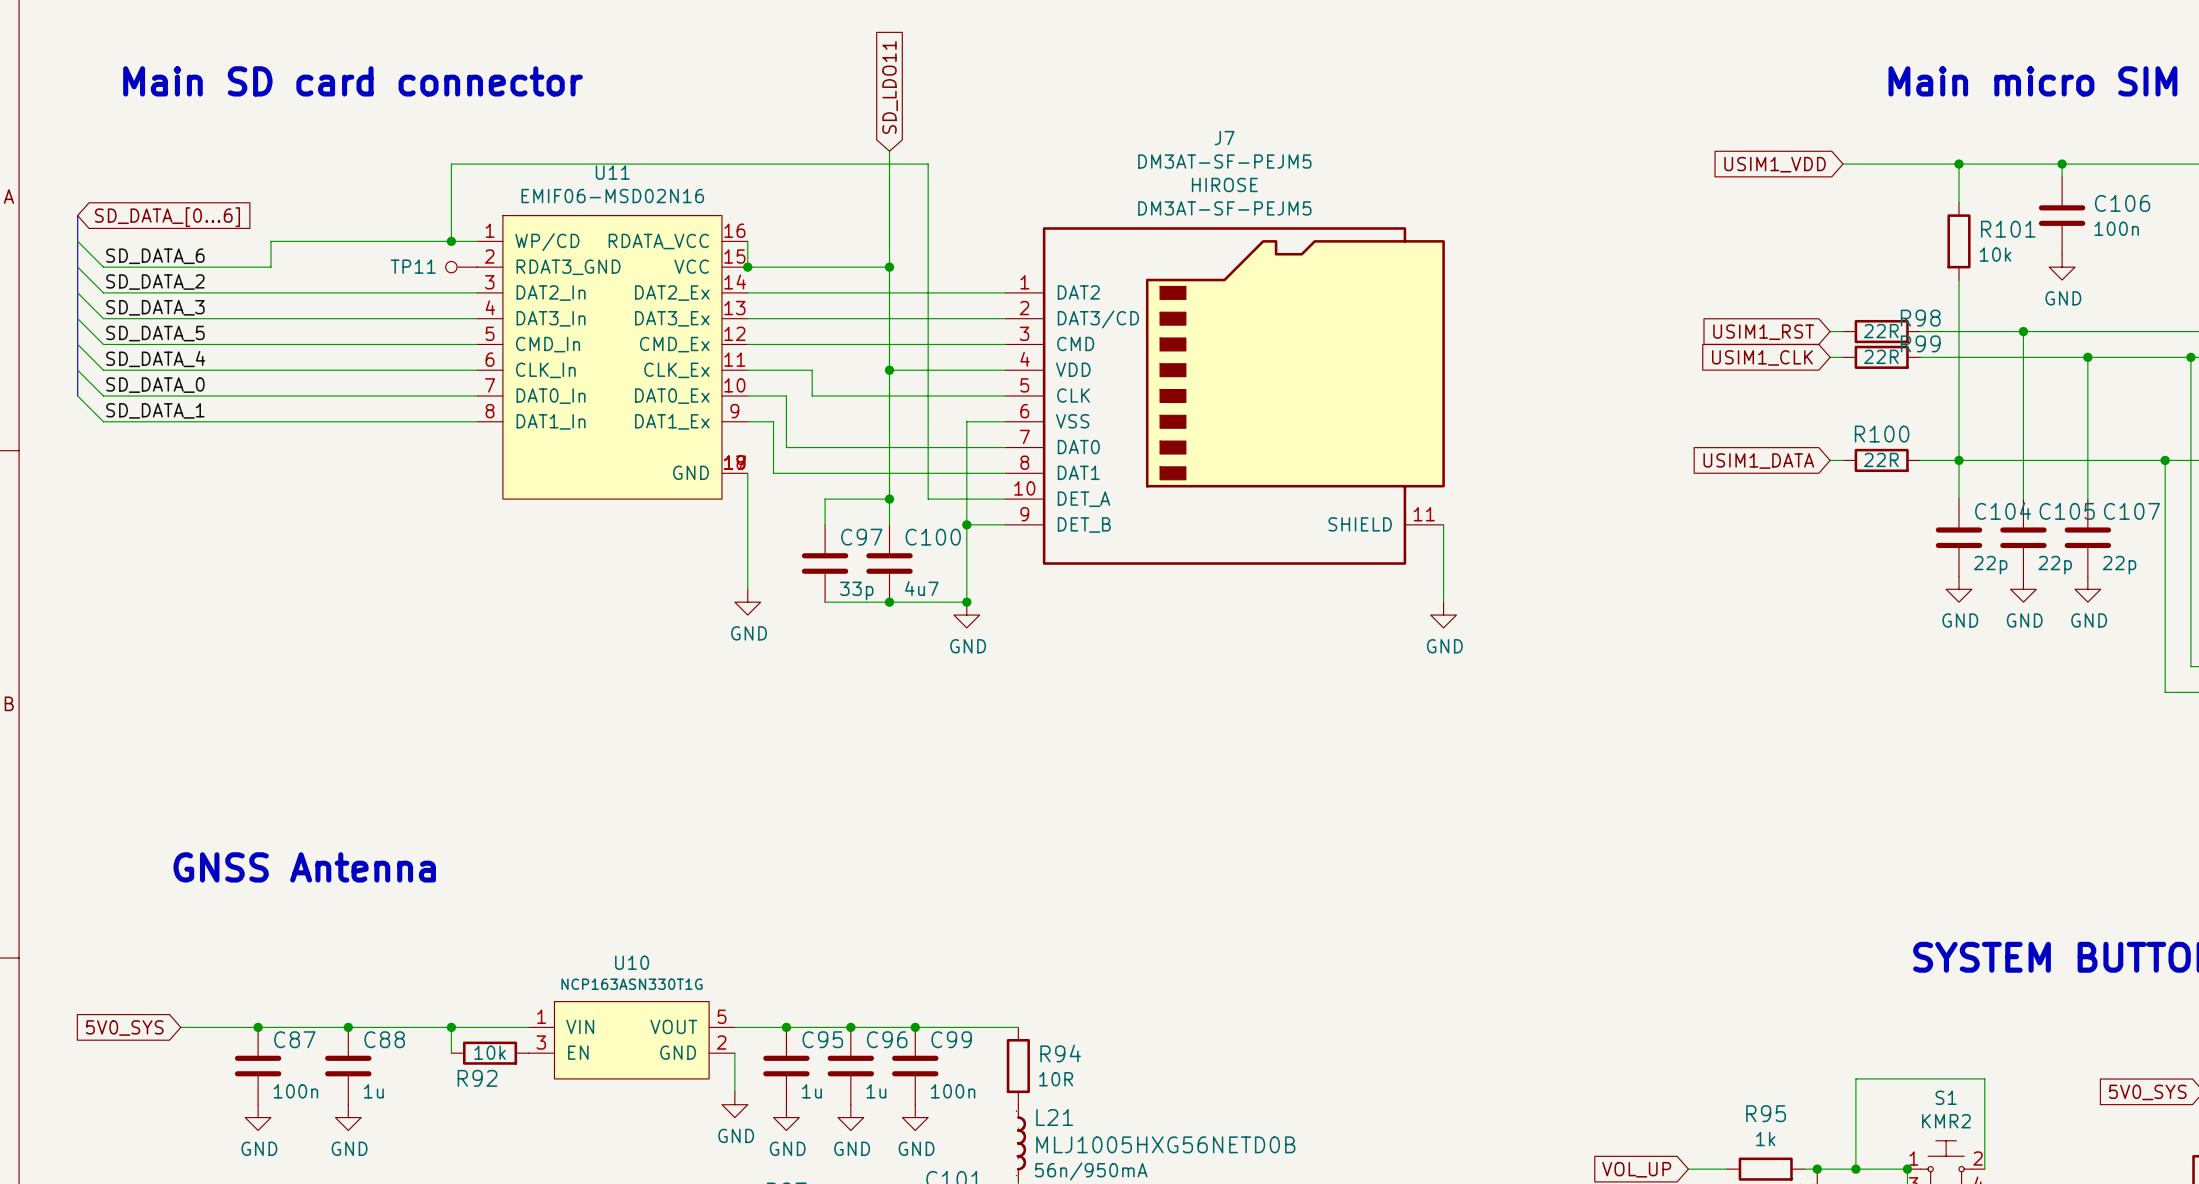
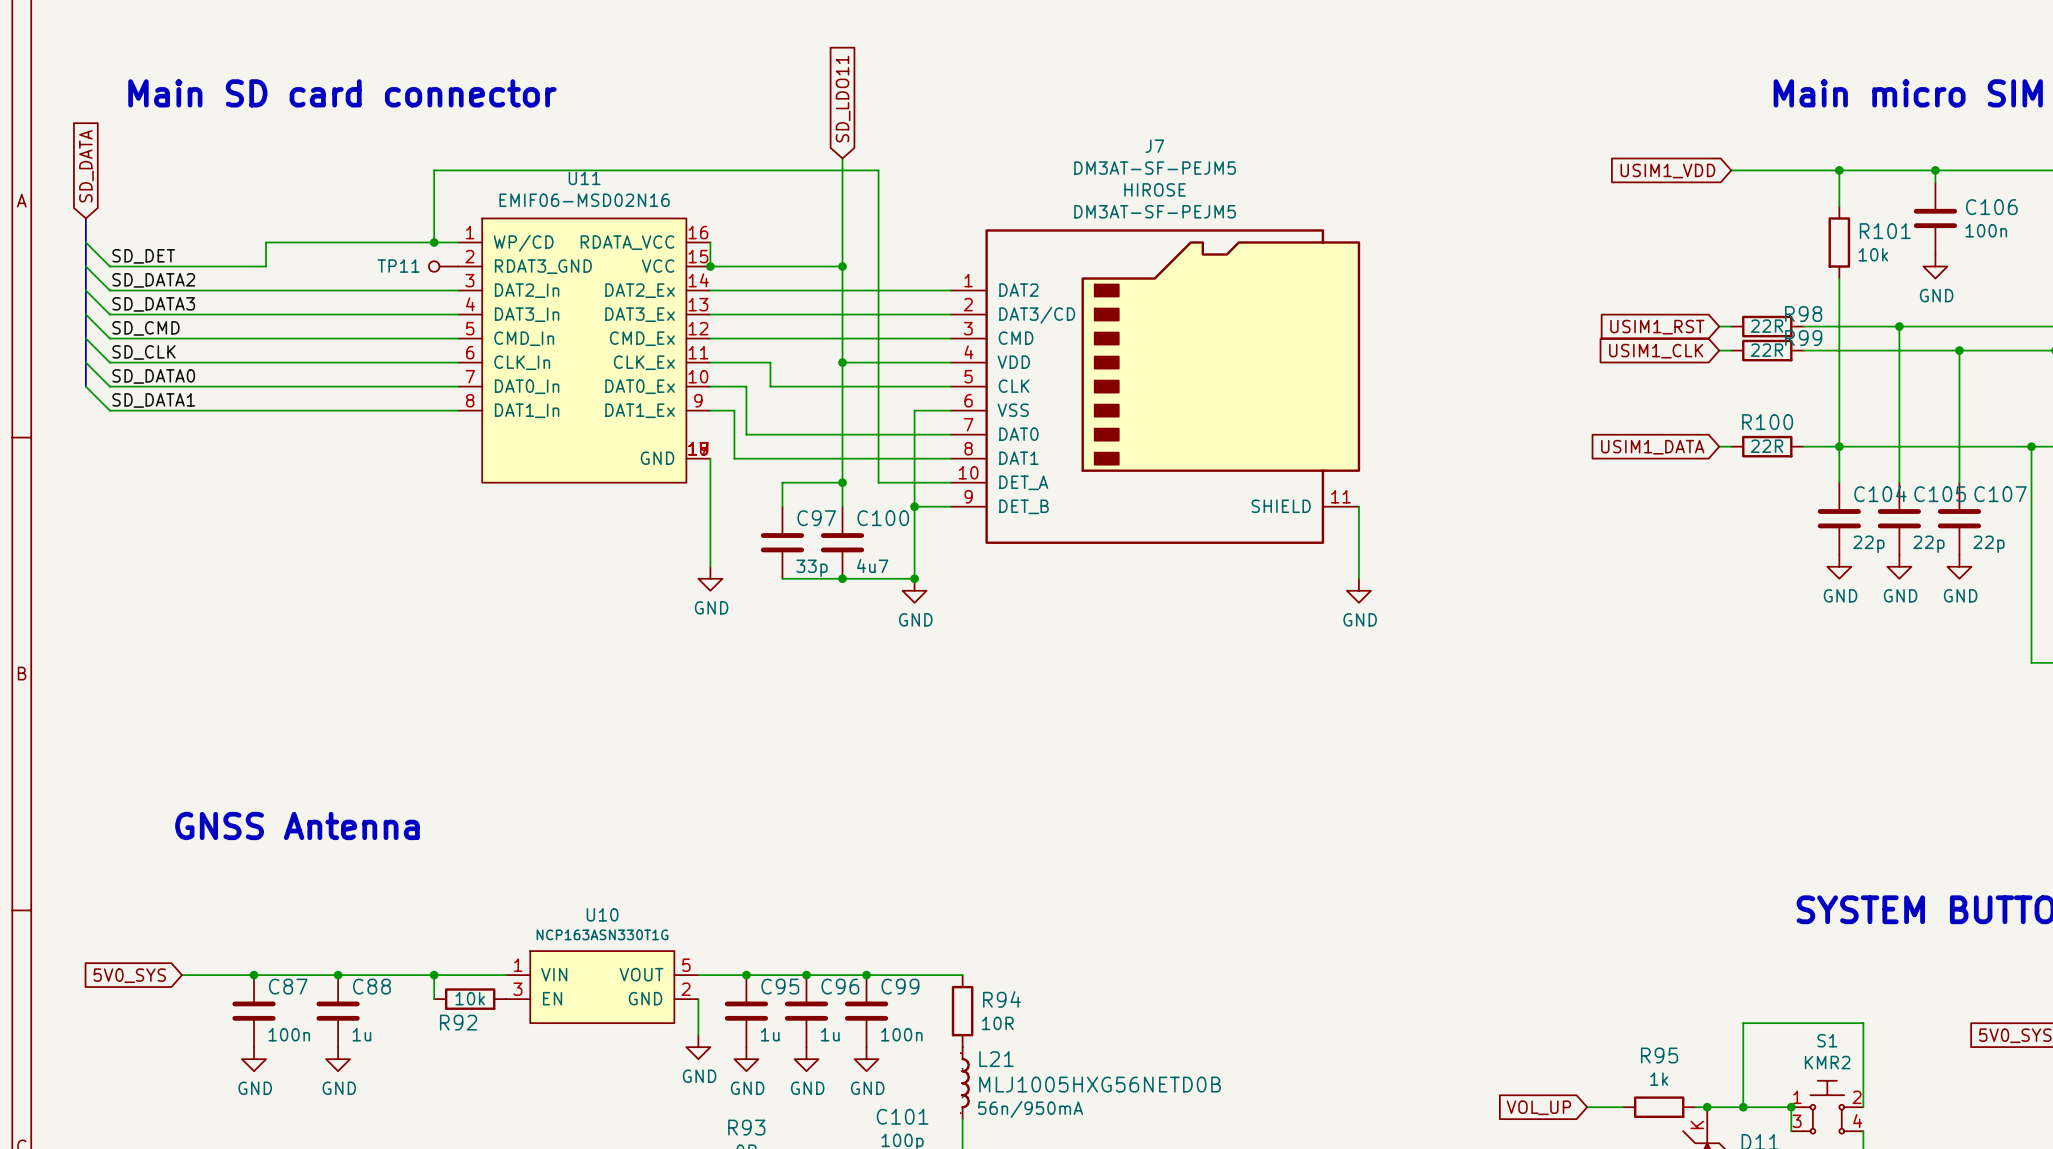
global label: SD_DATA_[0...6] (167, 217) -> SD_DATA (86, 166)
label: SD_DATA_6 (155, 256) -> SD_DET (143, 256)
label: SD_DATA_2 (155, 282) -> SD_DATA2 (153, 280)
label: SD_DATA_3 (155, 307) -> SD_DATA3 (153, 304)
label: SD_DATA_5 (155, 333) -> SD_CMD (146, 328)
label: SD_DATA_4 (155, 359) -> SD_CLK (144, 352)
label: SD_DATA_0 (155, 385) -> SD_DATA0 (153, 376)
label: SD_DATA_1 (155, 410) -> SD_DATA1 (153, 400)

